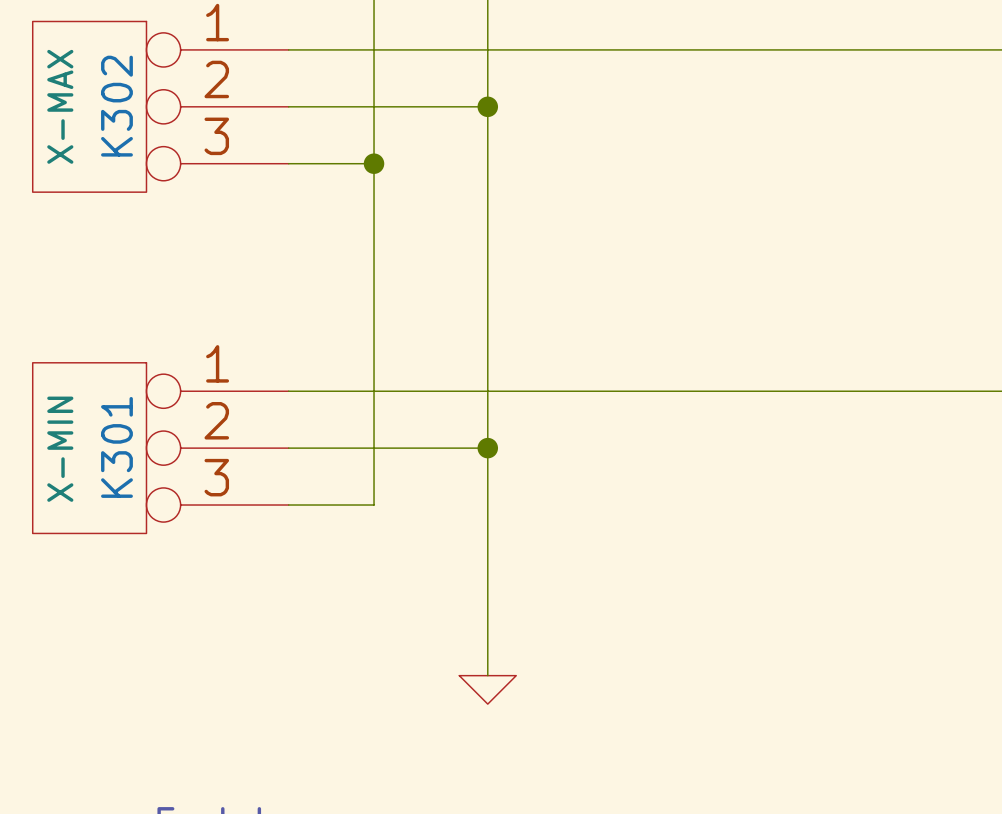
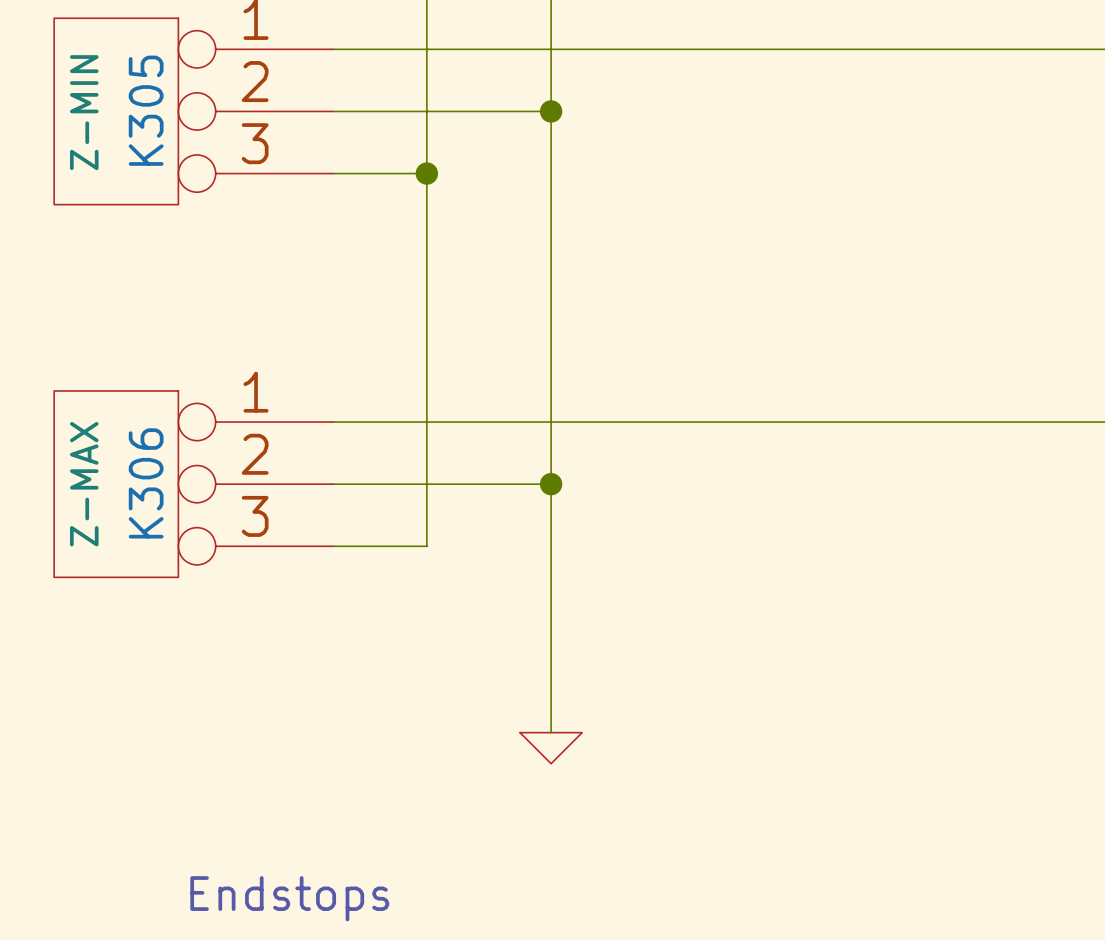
K302 value: X-MAX (60, 106) -> Z-MIN (84, 112)
K302 name: K302 (116, 106) -> K305 (146, 110)
K301 name: K301 (116, 447) -> K306 (146, 483)
K301 value: X-MIN (60, 449) -> Z-MAX (84, 484)

